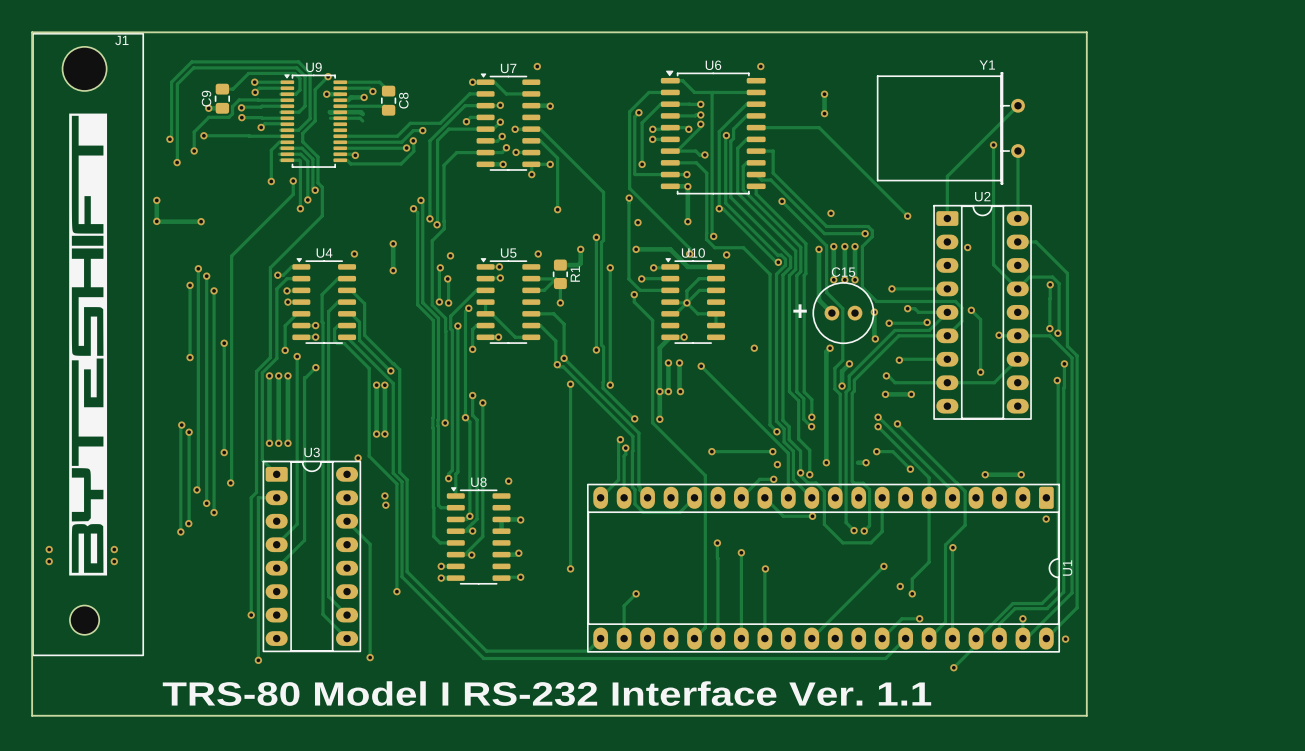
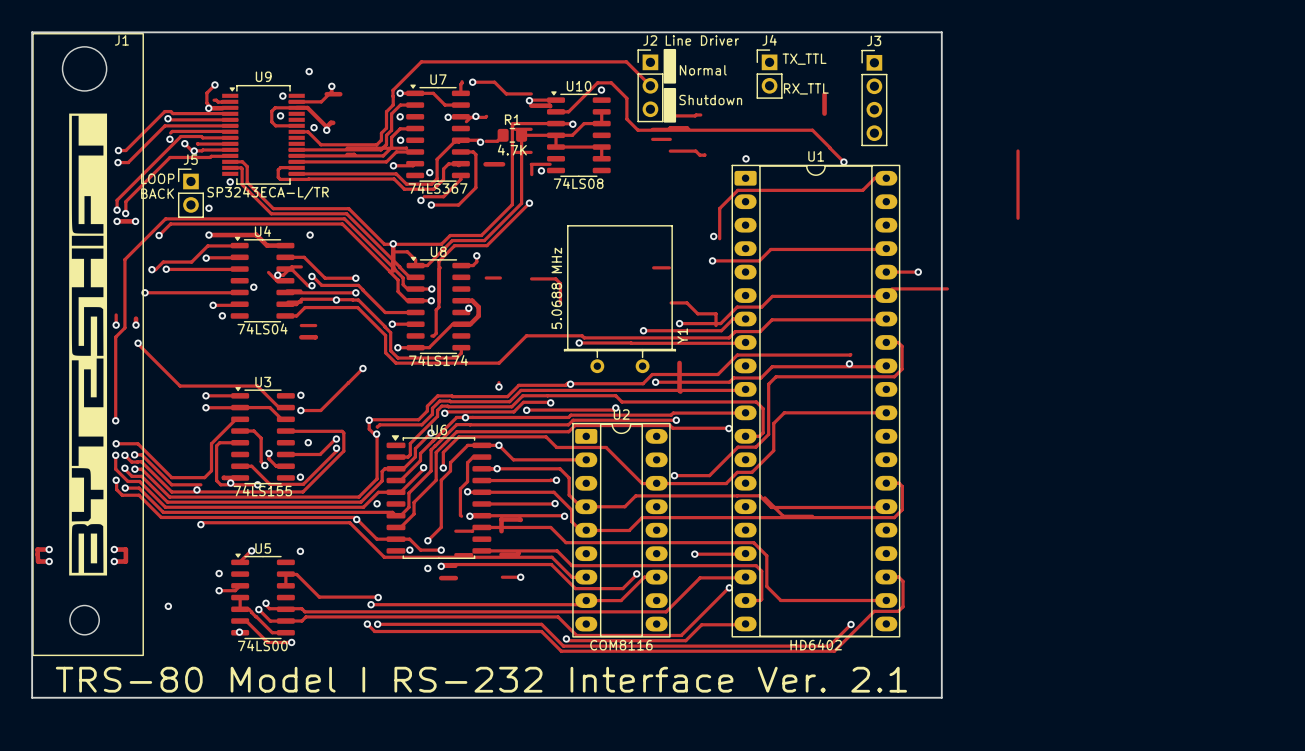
board edge: (941, 32) (1086, 32) (1086, 715) (32, 715) (32, 697) -> (941, 32) (941, 697) (32, 697)
text: none -> Line Driver (702, 40)
drawing: none -> [663, 48, 677, 123]
text: none -> TX_TTL (804, 59)
via: (537, 66) -> none
via: (760, 66) -> none
text: none -> Normal (703, 70)
via: none -> (309, 71)
U9 footprint: [280, 74, 348, 168] -> [222, 84, 305, 185]
J4: none -> (769, 74)
track: (328, 76) (315, 89) (315, 120) (302, 133) (302, 141) (317, 157) (317, 182) (322, 187) (322, 215) (270, 267) (270, 357) (256, 371) (256, 492) (251, 497) (251, 615) -> none
via: (328, 76) -> none
track: (670, 80) (682, 80) (694, 92) (756, 92) -> none
track: none -> (462, 81) (460, 93)
track: (254, 82) (280, 82) -> none
via: (254, 82) -> none
track: (347, 82) (379, 82) (388, 91) -> none
track: none -> (214, 84) (206, 93) (206, 103) (211, 107) (236, 107)
via: none -> (214, 84)
track: none -> (650, 85) (626, 61) (421, 61) (392, 90) (393, 105) (386, 111) (386, 128) (381, 133) (381, 140) (376, 144) (321, 144) (308, 131) (296, 131)
J2: none -> (650, 85)
track: none -> (331, 86) (331, 91) (321, 101) (289, 101)
via: none -> (331, 86)
track: (279, 88) (259, 88) (255, 92) -> none
track: (347, 88) (369, 88) (372, 91) -> none
track: (222, 89) (232, 89) (248, 73) (294, 73) (299, 78) (299, 90) (295, 94) (280, 94) -> none
text: none -> RX_TTL (806, 88)
via: none -> (601, 90)
via: (372, 91) -> none
via: (255, 92) -> none
track: (670, 92) (648, 92) (629, 111) (629, 188) (689, 248) (689, 253) -> none
track: (712, 92) (712, 234) (713, 236) -> none
track: none -> (400, 93) (433, 93) (445, 105) (460, 105)
via: none -> (400, 93)
track: (485, 93) (469, 93) (440, 123) (410, 123) (397, 136) (347, 136) -> none
via: (326, 94) -> none
via: (824, 94) -> none
via: none -> (282, 96)
track: (364, 97) (351, 97) (348, 100) -> none
via: (364, 97) -> none
C9: (222, 98) -> none
J3: none -> (874, 98)
text: none -> Shutdown (710, 100)
track: none -> (214, 100) (222, 101)
track: (280, 100) (239, 99) (232, 106) (232, 113) (229, 117) (208, 117) (194, 132) (194, 151) -> none
C8: (388, 100) -> none
via: none -> (529, 100)
track: none -> (556, 100) (529, 100)
track: (700, 104) (660, 104) (642, 122) (642, 164) -> none
via: (700, 104) -> none
track: (756, 104) (746, 104) (719, 131) (719, 208) (722, 208) (778, 262) -> none
track: none -> (415, 105) (400, 105) (391, 113) (391, 130) (386, 135) (386, 144) (380, 149) (289, 149)
track: (500, 105) (465, 105) (429, 140) (429, 218) -> none
via: (500, 105) -> none
track: (1018, 105) (947, 176) (947, 218) -> none
track: (280, 106) (241, 107) -> none
track: (347, 106) (384, 106) (388, 110) -> none
via: (550, 106) -> none
via: (241, 107) -> none
track: none -> (289, 107) (275, 107) (271, 111) (271, 121) (275, 125) (289, 125)
track: none -> (296, 107) (307, 107) (326, 127)
track: none -> (556, 111) (568, 111) (597, 82) (611, 82) (626, 98) (626, 119) (637, 130) (812, 130) (843, 162)
track: none -> (601, 111) (601, 123) (584, 123) (572, 135) (521, 135) (521, 203) (484, 240) (452, 240) (427, 265) (415, 265) (415, 260) (407, 251) (394, 251)
track: (280, 112) (299, 112) (305, 106) (305, 76) (296, 67) (193, 67) (177, 84) (177, 162) -> none
track: (329, 112) (360, 112) (362, 114) -> none
track: (638, 112) (634, 116) (634, 174) (686, 174) -> none
via: (638, 112) -> none
track: none -> (231, 113) (172, 113) (164, 111) (125, 150) (118, 150)
via: (824, 113) -> none
via: (700, 114) -> none
via: none -> (280, 115)
track: (756, 115) (746, 115) (733, 129) (733, 138) (730, 141) (730, 197) (790, 257) (790, 267) (782, 275) (782, 420) (789, 426) (789, 439) (800, 451) (800, 475) (807, 483) (816, 483) (824, 491) (824, 524) (842, 542) (870, 542) (882, 531) (882, 497) -> none
via: none -> (400, 116)
via: none -> (475, 116)
track: (241, 117) (280, 118) -> none
via: (241, 117) -> none
via: none -> (448, 117)
track: none -> (167, 118) (236, 119)
via: none -> (167, 118)
track: (330, 118) (359, 118) (362, 120) -> none
via: (466, 121) -> none
U7 position: (508, 121) -> (438, 133)
track: none -> (333, 122) (326, 127)
track: (500, 122) (493, 129) (448, 129) (437, 140) (437, 224) -> none
via: (500, 122) -> none
track: (280, 123) (264, 123) (261, 127) -> none
track: none -> (512, 123) (512, 204) (481, 235) (450, 235) (441, 244) (384, 244) (348, 208) (273, 208) (247, 182) (247, 166) (242, 161) (237, 161)
track: none -> (572, 124) (514, 123) (512, 126)
via: none -> (572, 124)
track: (700, 124) (700, 127) (677, 151) -> none
via: (700, 124) -> none
track: none -> (236, 125) (164, 125) (128, 162) (118, 162)
via: (261, 127) -> none
via: none -> (314, 127)
track: (756, 127) (819, 127) (907, 216) -> none
track: none -> (414, 128) (400, 128) (391, 137) (391, 147) (383, 155) (289, 155)
Y1 rotation: 0° (951, 128) -> 90° clockwise (619, 299)
Y1 position: (951, 128) -> (619, 299)
via: (515, 129) -> none
track: (531, 129) (540, 129) (603, 192) (603, 240) (601, 242) (603, 388) (634, 418) -> none
via: (652, 129) -> none
via: (688, 129) -> none
track: (280, 130) (298, 130) (310, 118) (310, 73) (298, 61) (191, 61) (171, 82) (171, 137) (169, 139) -> none
via: none -> (326, 130)
track: (422, 130) (413, 130) (401, 142) (347, 142) -> none
via: (422, 130) -> none
track: none -> (236, 131) (172, 131) (170, 133)
U6 position: (713, 132) -> (438, 497)
track: (203, 135) (280, 136) -> none
via: (203, 135) -> none
track: none -> (556, 135) (556, 147) (601, 147) (601, 158)
track: (726, 135) (725, 203) (777, 255) (781, 255) (785, 259) (785, 265) (776, 274) (776, 421) (784, 428) (784, 441) (793, 451) (793, 479) (811, 497) -> none
via: (726, 135) -> none
via: (502, 136) -> none
track: none -> (236, 137) (180, 136) (117, 200) (117, 210)
via: (652, 139) -> none
track: (756, 139) (746, 139) (737, 148) (737, 193) (795, 251) (795, 269) (789, 275) (789, 391) (798, 400) (798, 439) (809, 450) (809, 474) -> none
via: none -> (400, 140)
track: (413, 140) (413, 151) (401, 163) (350, 163) (347, 160) -> none
via: (413, 140) -> none
track: (531, 140) (540, 140) (557, 158) (557, 209) -> none
track: (280, 142) (271, 150) (271, 181) -> none
track: none -> (480, 142) (478, 140) (454, 142) (437, 159) (437, 178) (431, 184) (406, 184) (396, 173) (289, 173)
via: none -> (480, 142)
track: none -> (184, 143) (192, 150) (236, 150)
via: none -> (184, 143)
track: none -> (197, 143) (236, 144)
track: (993, 145) (993, 264) (1017, 288) (1029, 277) (1052, 277) (1059, 283) (1057, 333) -> none
via: (993, 145) -> none
track: (506, 147) (502, 152) (456, 152) (444, 165) (444, 228) (432, 240) (432, 304) (445, 318) (445, 423) -> none
via: (506, 147) -> none
track: (280, 148) (301, 148) (312, 159) (312, 187) (315, 190) -> none
via: (406, 148) -> none
via: none -> (118, 150)
R1 value: none -> 4.7K (512, 149)
track: none -> (415, 151) (396, 151) (386, 161) (289, 161)
track: none -> (460, 151) (473, 151) (475, 154) (475, 187) (458, 205) (431, 205)
track: (756, 151) (773, 151) (773, 173) (826, 226) (868, 226) (872, 230) (872, 236) (862, 246) (862, 287) (876, 301) (955, 301) (961, 307) (961, 321) (947, 335) (898, 335) (854, 380) (854, 391) (852, 393) (852, 481) (854, 483) (863, 483) (869, 489) (869, 525) (864, 531) -> none
via: (516, 152) -> none
track: (279, 154) (280, 154) -> none
track: (287, 154) (300, 154) (307, 161) (307, 199) -> none
via: (704, 154) -> none
via: (355, 155) -> none
track: none -> (236, 156) (170, 157) (125, 201) (125, 213)
via: none -> (746, 158)
track: (280, 160) (300, 161) (300, 208) -> none
via: none -> (118, 162)
via: (177, 162) -> none
track: (670, 162) (696, 162) (706, 173) (706, 239) (714, 247) (743, 247) (770, 274) (770, 424) (776, 431) -> none
track: (756, 162) (746, 162) (743, 166) (743, 189) (800, 247) (800, 271) (796, 275) (796, 391) (803, 398) (803, 419) (811, 426) -> none
via: none -> (843, 162)
track: none -> (415, 163) (413, 165) (393, 165)
track: none -> (460, 163) (459, 165) (448, 163) (443, 169) (443, 179) (433, 189) (404, 189) (394, 179) (280, 179) (278, 177) (278, 169) (280, 167) (289, 167)
via: (503, 164) -> none
via: (550, 164) -> none
via: (642, 164) -> none
via: none -> (393, 165)
track: none -> (237, 167) (242, 168) (242, 184) (271, 213) (346, 213) (409, 277)
via: none -> (541, 170)
via: none -> (429, 172)
via: (531, 174) -> none
via: (686, 174) -> none
track: (756, 174) (761, 180) (770, 180) (824, 233) (865, 233) -> none
track: none -> (460, 175) (460, 179) (443, 196) (424, 196)
text: none -> LOOP (157, 178)
track: none -> (886, 178) (874, 178) (862, 190) (737, 190) (719, 208) (719, 238)
via: none -> (230, 181)
via: (271, 181) -> none
track: (293, 181) (293, 194) (231, 256) (230, 483) -> none
via: (293, 181) -> none
U10 value: none -> 74LS08 (578, 183)
track: (670, 186) (687, 186) (687, 221) -> none
via: (687, 186) -> none
track: (756, 186) (756, 193) (805, 243) (804, 391) (811, 399) (811, 417) -> none
U7 value: none -> 74LS367 (438, 188)
via: (315, 190) -> none
U9 value: none -> SP3243ECA-L/TR (268, 193)
text: none -> BACK (157, 193)
J5: none -> (190, 193)
track: (629, 198) (628, 279) (640, 290) (670, 290) -> none
via: (629, 198) -> none
via: (307, 199) -> none
track: (156, 200) (157, 221) (201, 221) -> none
via: (156, 200) -> none
track: (420, 200) (422, 202) (422, 302) (438, 318) (438, 505) (441, 507) (455, 507) -> none
track: (782, 201) (826, 245) (826, 292) (842, 308) (842, 360) (834, 368) (834, 389) (840, 394) (840, 492) (835, 497) -> none
via: (782, 201) -> none
track: none -> (529, 203) (486, 245) (454, 245) (438, 261) (438, 307) (436, 310) (436, 333) (431, 336)
via: none -> (529, 203)
via: none -> (431, 205)
via: none -> (208, 208)
via: (300, 208) -> none
track: (413, 208) (417, 212) (417, 304) (433, 320) (433, 536) (440, 542) (455, 542) -> none
via: (413, 208) -> none
via: (719, 208) -> none
via: (557, 209) -> none
via: none -> (117, 210)
via: none -> (125, 213)
via: (830, 213) -> none
via: (907, 216) -> none
via: (429, 218) -> none
track: none -> (117, 221) (135, 221)
via: none -> (117, 221)
via: none -> (135, 221)
via: (156, 221) -> none
via: (201, 221) -> none
via: (687, 221) -> none
via: (637, 222) -> none
via: (437, 224) -> none
via: (865, 233) -> none
track: none -> (159, 235) (170, 223) (342, 223) (398, 280) (398, 291) (407, 300) (431, 300)
via: none -> (159, 235)
track: none -> (208, 235) (256, 234) (267, 245) (285, 245)
via: none -> (208, 235)
via: none -> (310, 235)
track: (596, 237) (596, 350) -> none
via: (596, 237) -> none
track: (1017, 241) (1036, 241) (1067, 273) (1067, 346) (1077, 355) (1077, 607) (1046, 638) -> none
track: none -> (239, 245) (207, 245) (191, 262) (163, 262) (155, 269) (151, 269)
track: (833, 246) (833, 279) -> none
via: (833, 246) -> none
track: (844, 246) (844, 279) -> none
via: (844, 246) -> none
track: (855, 246) (855, 279) -> none
via: (855, 246) -> none
via: (967, 247) -> none
track: (580, 249) (580, 263) (578, 265) (560, 265) -> none
via: (580, 249) -> none
track: (636, 249) (670, 249) (687, 266) (716, 266) -> none
via: (636, 249) -> none
track: (818, 249) (818, 300) (831, 313) -> none
via: (818, 249) -> none
track: none -> (885, 249) (770, 249) (759, 260) (712, 260)
via: (354, 253) -> none
via: (538, 253) -> none
via: (689, 253) -> none
via: (726, 254) -> none
via: (450, 255) -> none
track: none -> (476, 255) (476, 261) (473, 265) (461, 265)
via: none -> (476, 255)
track: none -> (239, 257) (206, 258)
track: none -> (285, 257) (304, 257) (325, 278) (355, 278)
via: none -> (206, 258)
via: none -> (712, 260)
via: (778, 262) -> none
via: (499, 266) -> none
via: (440, 267) -> none
track: (610, 267) (610, 385) -> none
via: (610, 267) -> none
via: (653, 267) -> none
track: (198, 268) (196, 489) -> none
via: (198, 268) -> none
via: none -> (151, 269)
track: none -> (166, 269) (239, 269)
via: none -> (166, 269)
track: none -> (291, 269) (308, 285) (311, 285)
via: (393, 270) -> none
track: none -> (268, 272) (276, 280) (285, 280)
track: none -> (886, 272) (918, 272)
via: none -> (918, 272)
R1 rotation: 0° (560, 274) -> 90° clockwise (512, 135)
R1 position: (560, 274) -> (512, 135)
R1 name position: R1 (575, 274) -> R1 (512, 119)
track: (206, 276) (206, 503) -> none
via: (206, 276) -> none
track: none -> (311, 276) (321, 285) (358, 285) (385, 312) (415, 312)
via: none -> (311, 276)
track: (301, 278) (287, 278) (276, 288) (276, 358) (262, 372) (262, 459) (276, 474) -> none
track: (347, 278) (338, 278) (322, 294) (323, 614) (347, 638) -> none
via: none -> (355, 278)
track: (447, 278) (448, 303) -> none
via: (447, 278) -> none
via: (500, 278) -> none
track: (555, 278) (544, 290) (531, 290) -> none
via: (641, 278) -> none
track: (670, 278) (641, 278) -> none
track: (716, 278) (699, 278) (686, 290) (686, 302) -> none
via: (833, 279) -> none
via: (844, 279) -> none
via: (855, 279) -> none
track: (1050, 284) (1049, 328) -> none
via: (1050, 284) -> none
track: (190, 285) (190, 357) -> none
via: (190, 285) -> none
via: none -> (311, 285)
via: none -> (253, 287)
Y1 value: none -> 5.0688 MHz (556, 288)
via: (891, 288) -> none
track: none -> (431, 289) (407, 289) (403, 284) (403, 277) (344, 218) (165, 218) (124, 259) (124, 327) (115, 337) (115, 420)
via: none -> (431, 289)
track: (214, 290) (214, 512) -> none
via: (214, 290) -> none
via: (287, 290) -> none
track: (347, 290) (351, 290) (364, 303) (364, 335) (399, 369) (399, 472) (407, 479) (407, 571) (486, 651) (588, 651) (600, 638) -> none
track: (485, 290) (476, 290) (450, 316) (452, 470) (448, 473) (448, 478) -> none
track: (716, 290) (699, 290) (676, 313) -> none
track: none -> (145, 292) (239, 292)
via: none -> (145, 292)
track: none -> (285, 292) (355, 292)
via: none -> (355, 292)
track: (634, 294) (634, 302) (652, 320) (652, 422) (705, 475) (705, 627) (694, 638) -> none
via: (634, 294) -> none
track: none -> (885, 296) (772, 296) (761, 307) (737, 307) (720, 323) (679, 323)
U4 position: (324, 300) -> (262, 279)
via: none -> (336, 300)
via: none -> (431, 300)
track: none -> (467, 300) (472, 300) (478, 307) (478, 315) (470, 324) (452, 324) (429, 347) (397, 347)
U5 position: (508, 300) -> (263, 596)
U10 position: (693, 300) -> (578, 134)
via: (287, 302) -> none
track: (347, 302) (338, 302) (328, 311) (328, 596) (347, 615) -> none
via: (439, 302) -> none
track: (485, 302) (485, 313) (491, 313) (515, 337) (531, 337) -> none
via: (560, 302) -> none
via: (686, 302) -> none
via: (448, 303) -> none
track: none -> (285, 304) (296, 304) (301, 299) (358, 300) (390, 332) (390, 350) (398, 358) (456, 358) (461, 353) (461, 347)
track: none -> (213, 305) (238, 305)
via: none -> (213, 305)
track: (468, 308) (465, 311) (465, 417) (469, 422) (469, 514) (464, 519) -> none
track: (907, 308) (914, 308) (918, 312) (947, 312) (929, 330) (894, 330) (849, 376) (849, 389) (846, 392) (846, 522) (854, 530) -> none
via: (907, 308) -> none
track: (971, 310) (980, 319) (980, 372) -> none
via: (971, 310) -> none
text: + (800, 311) -> none
track: (874, 312) (875, 338) -> none
via: (874, 312) -> none
U2 position: (982, 312) -> (621, 530)
track: (301, 313) (297, 313) (285, 325) (285, 350) -> none
track: (347, 313) (351, 313) (359, 322) (359, 340) (390, 370) -> none
track: (531, 313) (553, 313) (564, 324) (564, 358) (638, 433) (638, 486) (647, 497) -> none
C15: (843, 313) -> none
track: none -> (116, 314) (116, 325)
via: none -> (222, 315)
track: none -> (285, 315) (296, 315) (305, 307) (357, 307) (385, 335) (385, 352) (395, 363) (499, 363) (526, 335) (729, 337) (735, 331) (760, 331) (772, 319) (885, 319)
track: none -> (136, 318) (136, 325)
track: none -> (745, 319) (733, 319) (721, 330) (643, 330)
track: (927, 322) (889, 323) -> none
via: (927, 322) -> none
via: none -> (679, 323)
via: (889, 323) -> none
track: none -> (392, 324) (415, 324)
via: none -> (392, 324)
via: none -> (116, 325)
via: none -> (136, 325)
via: (315, 325) -> none
track: (343, 325) (338, 325) (334, 329) (334, 340) (337, 343) (344, 343) (369, 368) (369, 420) -> (850, 354) (737, 355) (717, 374) (652, 374) (643, 383) (518, 385) (507, 396) (437, 395) (427, 406) (427, 411) (418, 419) (369, 420)
track: (485, 325) (476, 325) (472, 329) (472, 349) -> none
track: (531, 325) (540, 325) (555, 341) (555, 363) (559, 366) (563, 366) (632, 436) (632, 487) (634, 489) (634, 504) (643, 512) (679, 512) (694, 497) -> none
track: (457, 326) (457, 471) (455, 474) (455, 496) -> none
via: (457, 326) -> none
via: (1049, 328) -> none
U4 value: none -> 74LS04 (262, 328)
via: none -> (643, 330)
via: (1057, 333) -> none
track: (999, 335) (1049, 335) (1072, 357) (1072, 592) (1025, 639) (1022, 638) (1022, 618) -> none
via: (999, 335) -> none
via: (315, 337) -> none
track: (347, 337) (393, 383) (393, 473) (402, 481) (402, 576) (483, 658) (885, 658) (905, 638) -> none
via: (498, 337) -> none
track: (684, 337) (670, 337) (659, 347) (659, 419) -> none
via: (684, 337) -> none
via: (875, 338) -> none
track: none -> (579, 342) (744, 343)
via: none -> (579, 342)
track: none -> (886, 342) (898, 342) (902, 346) (902, 369) (894, 376) (776, 376) (768, 384) (768, 434) (755, 447) (738, 447) (709, 475) (674, 475)
track: none -> (138, 343) (180, 386) (257, 386) (278, 407)
via: none -> (138, 343)
track: (224, 343) (224, 452) -> none
via: (224, 343) -> none
via: none -> (397, 347)
via: (754, 348) -> none
track: (830, 348) (826, 351) (826, 462) -> none
via: (830, 348) -> none
via: (472, 349) -> none
via: (285, 350) -> none
via: (596, 350) -> none
track: (297, 356) (297, 524) (276, 544) -> none
via: (297, 356) -> none
via: (190, 357) -> none
via: (564, 358) -> none
track: (947, 359) (899, 360) -> none
track: (1017, 359) (994, 382) (895, 382) (886, 375) -> none
U8 value: none -> 74LS174 (438, 360)
via: (899, 360) -> none
track: (668, 362) (668, 391) (659, 391) -> none
via: (668, 362) -> none
via: (679, 362) -> none
track: (849, 363) (842, 371) (842, 386) -> none
track: (1064, 363) (1063, 592) (1047, 608) (1015, 608) (999, 624) (999, 638) -> none
via: (1064, 363) -> none
via: (557, 364) -> none
track: (701, 366) (788, 453) (788, 497) -> none
via: (701, 366) -> none
track: none -> (885, 366) (772, 366) (761, 377) (733, 377) (729, 382) (655, 382)
track: (315, 367) (304, 377) (304, 540) (276, 568) -> none
via: (315, 367) -> none
track: none -> (362, 368) (348, 383)
via: none -> (362, 368)
via: (390, 370) -> none
via: (980, 372) -> none
track: (269, 375) (269, 443) -> none
via: (269, 375) -> none
track: (278, 375) (278, 443) -> none
via: (278, 375) -> none
track: (287, 375) (287, 443) -> none
via: (287, 375) -> none
via: (886, 375) -> none
track: (1057, 380) (1058, 587) (1042, 603) (1012, 603) (975, 638) (975, 645) (953, 667) -> none
via: (1057, 380) -> none
track: none -> (498, 382) (498, 386)
via: none -> (655, 382)
track: none -> (348, 383) (320, 410) (300, 410)
track: (570, 384) (570, 568) -> none
track: (376, 385) (376, 434) -> none
via: (376, 385) -> none
track: (384, 385) (384, 434) -> none
via: (384, 385) -> none
via: (610, 385) -> none
via: none -> (498, 386)
via: (842, 386) -> none
track: none -> (744, 390) (521, 390) (509, 401) (439, 401) (432, 408) (432, 414) (421, 424) (379, 424) (377, 426)
via: (659, 391) -> none
via: (668, 391) -> none
via: (680, 391) -> none
track: (885, 394) (911, 394) -> none
via: (885, 394) -> none
via: (911, 394) -> none
track: none -> (205, 395) (240, 395)
via: none -> (205, 395)
via: none -> (300, 395)
track: (472, 395) (472, 415) (477, 419) (477, 519) (464, 531) -> none
via: (472, 395) -> none
track: (482, 402) (482, 536) (464, 554) -> none
via: (482, 402) -> none
track: none -> (550, 402) (523, 402) (513, 411) (444, 413)
via: none -> (550, 402)
track: none -> (205, 407) (239, 407)
via: none -> (205, 407)
track: none -> (240, 407) (269, 407) (281, 419)
track: none -> (615, 407) (613, 410) (526, 410) (528, 410)
via: none -> (615, 407)
via: none -> (300, 410)
via: none -> (526, 410)
track: none -> (886, 412) (784, 412) (773, 423) (773, 450) (752, 472) (737, 472) (726, 483) (642, 483) (606, 447) (556, 447) (546, 436) (458, 436) (443, 452) (443, 467)
via: none -> (444, 413)
track: none -> (745, 413) (571, 415) (568, 417) (456, 417) (420, 453) (420, 460) (400, 480)
via: (811, 417) -> none
track: (878, 417) (952, 490) (952, 497) -> none
via: (878, 417) -> none
via: (634, 418) -> none
track: none -> (235, 419) (211, 443) (211, 470) (204, 477) (171, 477) (137, 443) (116, 443)
via: (659, 419) -> none
via: none -> (115, 420)
via: none -> (369, 420)
track: none -> (676, 420) (573, 420) (568, 424) (456, 424) (431, 450) (431, 471) (408, 493) (408, 507) (400, 515)
via: none -> (676, 420)
via: (445, 423) -> none
track: (897, 423) (965, 491) (965, 525) (945, 544) (945, 622) (929, 638) -> none
via: (897, 423) -> none
track: (181, 425) (180, 531) -> none
via: (181, 425) -> none
via: (811, 426) -> none
track: (878, 426) (929, 477) (929, 562) (912, 579) (912, 593) -> none
via: (878, 426) -> none
track: none -> (728, 428) (672, 428) (670, 425) (575, 425) (568, 431) (456, 431) (436, 452) (436, 480) (414, 502) (414, 514) (400, 527)
via: none -> (728, 428)
track: (369, 429) (369, 456) (396, 483) (396, 591) -> (369, 429) (377, 436) (377, 478) (358, 497) (169, 497) (141, 469) (134, 469)
track: none -> (240, 431) (253, 431) (261, 438) (261, 461) (264, 465)
track: none -> (286, 431) (342, 431) (343, 433) (343, 451) (302, 491) (171, 491) (141, 461) (131, 462) (124, 455)
via: (776, 431) -> none
track: (189, 432) (188, 523) -> none
via: (189, 432) -> none
track: none -> (430, 433) (415, 448) (415, 456) (403, 468)
via: none -> (430, 433)
via: (384, 434) -> none
track: none -> (745, 436) (759, 436) (763, 432) (763, 408) (756, 401) (622, 401) (615, 395) (522, 395) (511, 406) (441, 406) (437, 410) (437, 416) (410, 443) (410, 454) (408, 457) (396, 457)
track: none -> (336, 439) (320, 454) (285, 454)
via: none -> (336, 439)
track: (620, 439) (618, 441) (618, 479) (600, 497) -> none
via: (620, 439) -> none
track: none -> (240, 442) (219, 442) (216, 445) (216, 480) (220, 484) (257, 484)
via: none -> (308, 442)
via: none -> (116, 443)
via: (269, 443) -> none
via: (278, 443) -> none
via: (287, 443) -> none
via: none -> (498, 445)
track: none -> (336, 448) (336, 451) (303, 484) (269, 484) (251, 466) (240, 466)
via: none -> (336, 448)
track: (625, 448) (624, 497) -> none
via: (625, 448) -> none
track: (711, 451) (772, 451) -> none
via: (711, 451) -> none
via: (772, 451) -> none
track: (876, 451) (892, 451) (910, 469) -> none
via: (876, 451) -> none
via: (224, 452) -> none
U3 name position: U3 (312, 452) -> U3 (263, 382)
track: none -> (269, 453) (269, 459) (276, 466) (285, 466)
via: none -> (269, 453)
track: none -> (134, 454) (141, 454) (171, 484) (200, 484)
via: none -> (134, 454)
track: none -> (115, 455) (115, 469) (127, 481) (139, 481) (165, 507) (363, 507) (378, 492) (396, 492)
via: none -> (115, 455)
via: none -> (124, 455)
track: none -> (481, 457) (473, 457) (467, 462) (467, 481) (460, 488) (461, 516)
via: (358, 458) -> none
track: none -> (586, 459) (513, 459) (498, 445) (467, 445) (450, 462) (450, 470) (441, 480) (441, 527) (427, 540)
U3 footprint: [262, 460, 361, 652] -> [231, 387, 295, 485]
via: (826, 462) -> none
track: (858, 462) (866, 462) -> none
via: (866, 462) -> none
via: (777, 464) -> none
via: none -> (264, 465)
track: none -> (423, 467) (400, 492)
via: none -> (423, 467)
via: none -> (443, 467)
track: none -> (124, 468) (131, 476) (141, 476) (167, 502) (360, 502) (382, 480) (382, 471) (384, 468) (396, 468)
via: none -> (124, 468)
track: none -> (481, 468) (560, 468) (569, 477) (569, 495) (581, 507)
via: none -> (134, 469)
via: (910, 469) -> none
via: (800, 472) -> none
via: (809, 474) -> none
track: (985, 474) (1021, 474) -> none
via: (985, 474) -> none
via: (1021, 474) -> none
via: none -> (674, 475)
track: none -> (223, 477) (240, 477)
via: none -> (300, 477)
via: (448, 478) -> none
track: (773, 479) (759, 479) (741, 497) -> none
via: (773, 479) -> none
track: none -> (116, 480) (116, 489) (122, 495) (139, 495) (161, 517) (354, 517) (376, 539) (409, 539) (420, 550) (441, 550)
via: none -> (116, 480)
track: none -> (556, 480) (481, 480)
via: none -> (556, 480)
via position: (508, 481) -> (497, 468)
track: none -> (886, 483) (899, 483) (902, 486) (902, 509) (894, 517) (642, 517) (629, 530) (580, 530) (571, 521) (571, 510) (553, 492) (467, 491)
via: none -> (257, 484)
track: none -> (125, 488) (139, 488) (163, 512) (392, 512) (396, 515)
via: none -> (125, 488)
U3 value: none -> 74LS155 (262, 490)
via: none -> (467, 491)
via: (384, 495) -> none
track: none -> (737, 495) (759, 495) (771, 507) (885, 507)
track: none -> (737, 495) (635, 495) (624, 506) (586, 506)
track: (276, 497) (258, 497) (258, 660) -> none
via: (206, 503) -> none
via: none -> (377, 503)
track: none -> (555, 503) (481, 503)
via: none -> (555, 503)
via: (385, 505) -> none
via: (214, 512) -> none
track: none -> (481, 515) (564, 516)
via: none -> (564, 516)
via: (812, 516) -> none
via: none -> (356, 519)
via: (520, 519) -> none
via: (1046, 519) -> none
track: (347, 521) (370, 544) (370, 657) -> none
via: (188, 523) -> none
track: none -> (200, 524) (202, 522) (349, 522) (384, 557) (551, 557) (572, 577) (585, 577)
via: none -> (200, 524)
track: none -> (481, 527) (550, 527) (566, 542) (753, 542) (766, 555) (766, 586) (780, 600) (886, 600)
via: (854, 530) -> none
via: (180, 531) -> none
via: (472, 531) -> none
via: (864, 531) -> none
U8 position: (478, 535) -> (438, 305)
via: none -> (427, 540)
track: (717, 543) (717, 638) -> none
via: (717, 543) -> none
track: (952, 547) (952, 638) -> none
via: (952, 547) -> none
track: none -> (45, 549) (37, 549) (38, 561) (45, 561)
track: none -> (114, 549) (125, 549) (125, 561) (114, 561)
track: none -> (251, 550) (240, 561)
via: none -> (251, 550)
via: none -> (409, 550)
via: none -> (441, 550)
track: none -> (481, 550) (557, 550) (571, 565) (756, 565) (761, 571) (761, 599) (745, 600)
via: none -> (300, 551)
track: (741, 552) (741, 638) -> none
via: (741, 552) -> none
via: (518, 553) -> none
track: none -> (694, 554) (744, 554)
via: none -> (694, 554)
via: (471, 555) -> none
track: none -> (441, 564) (551, 564) (575, 588) (622, 588) (636, 573)
track: (883, 566) (811, 638) -> none
via: (883, 566) -> none
via: none -> (427, 568)
via: (570, 568) -> none
track: (765, 568) (764, 638) -> none
via: (765, 568) -> none
U1 rotation: 0° (823, 568) -> 90° counterclockwise (815, 401)
via: none -> (219, 573)
track: none -> (285, 574) (285, 585)
track: none -> (286, 574) (296, 574) (319, 597) (378, 597)
track: none -> (656, 577) (644, 577) (621, 600) (586, 600)
track: none -> (744, 577) (700, 577) (666, 611) (304, 611) (301, 608) (286, 608)
track: none -> (886, 577) (898, 577) (903, 581) (903, 606) (898, 611) (874, 611) (834, 651) (561, 651) (541, 631) (374, 631) (367, 624)
via: (441, 578) -> none
track: none -> (240, 585) (235, 590) (219, 590)
via: (900, 586) -> none
track: none -> (729, 587) (681, 635) (576, 635) (558, 616) (305, 616) (301, 621) (285, 621)
via: none -> (729, 587)
via: none -> (219, 590)
via: (396, 591) -> none
track: (636, 593) (624, 605) (624, 638) -> none
via position: (636, 593) -> (636, 573)
via: (912, 593) -> none
track: none -> (240, 597) (240, 609) (248, 609) (272, 632) (285, 632)
via: none -> (378, 597)
track: none -> (266, 603) (269, 608) (285, 608)
via: none -> (266, 603)
track: none -> (371, 604) (585, 604)
via: none -> (371, 604)
via: none -> (168, 606)
track: none -> (258, 609) (270, 621) (285, 621)
via: none -> (258, 609)
via: (251, 615) -> none
track: (919, 618) (901, 618) (882, 638) -> none
via: (919, 618) -> none
via: (1022, 618) -> none
track: none -> (245, 620) (267, 642) (291, 642)
via: none -> (367, 624)
track: none -> (377, 624) (541, 624) (563, 646) (829, 646) (851, 624)
via: none -> (377, 624)
track: none -> (744, 624) (701, 624) (685, 640) (568, 640) (566, 638)
via: none -> (851, 624)
via: none -> (239, 632)
via: none -> (566, 638)
via: (1065, 639) -> none
via: none -> (291, 642)
U5 value: none -> 74LS00 (262, 645)
U2 value: none -> COM8116 (621, 645)
U1 value: none -> HD6402 (816, 644)
via: (370, 657) -> none
via: (258, 660) -> none
via: (953, 667) -> none
text: TRS-80 Model I RS-232 Interface Ver. 1.1 (546, 693) -> TRS-80 Model I RS-232 Interface Ver. 2.1 (481, 679)

